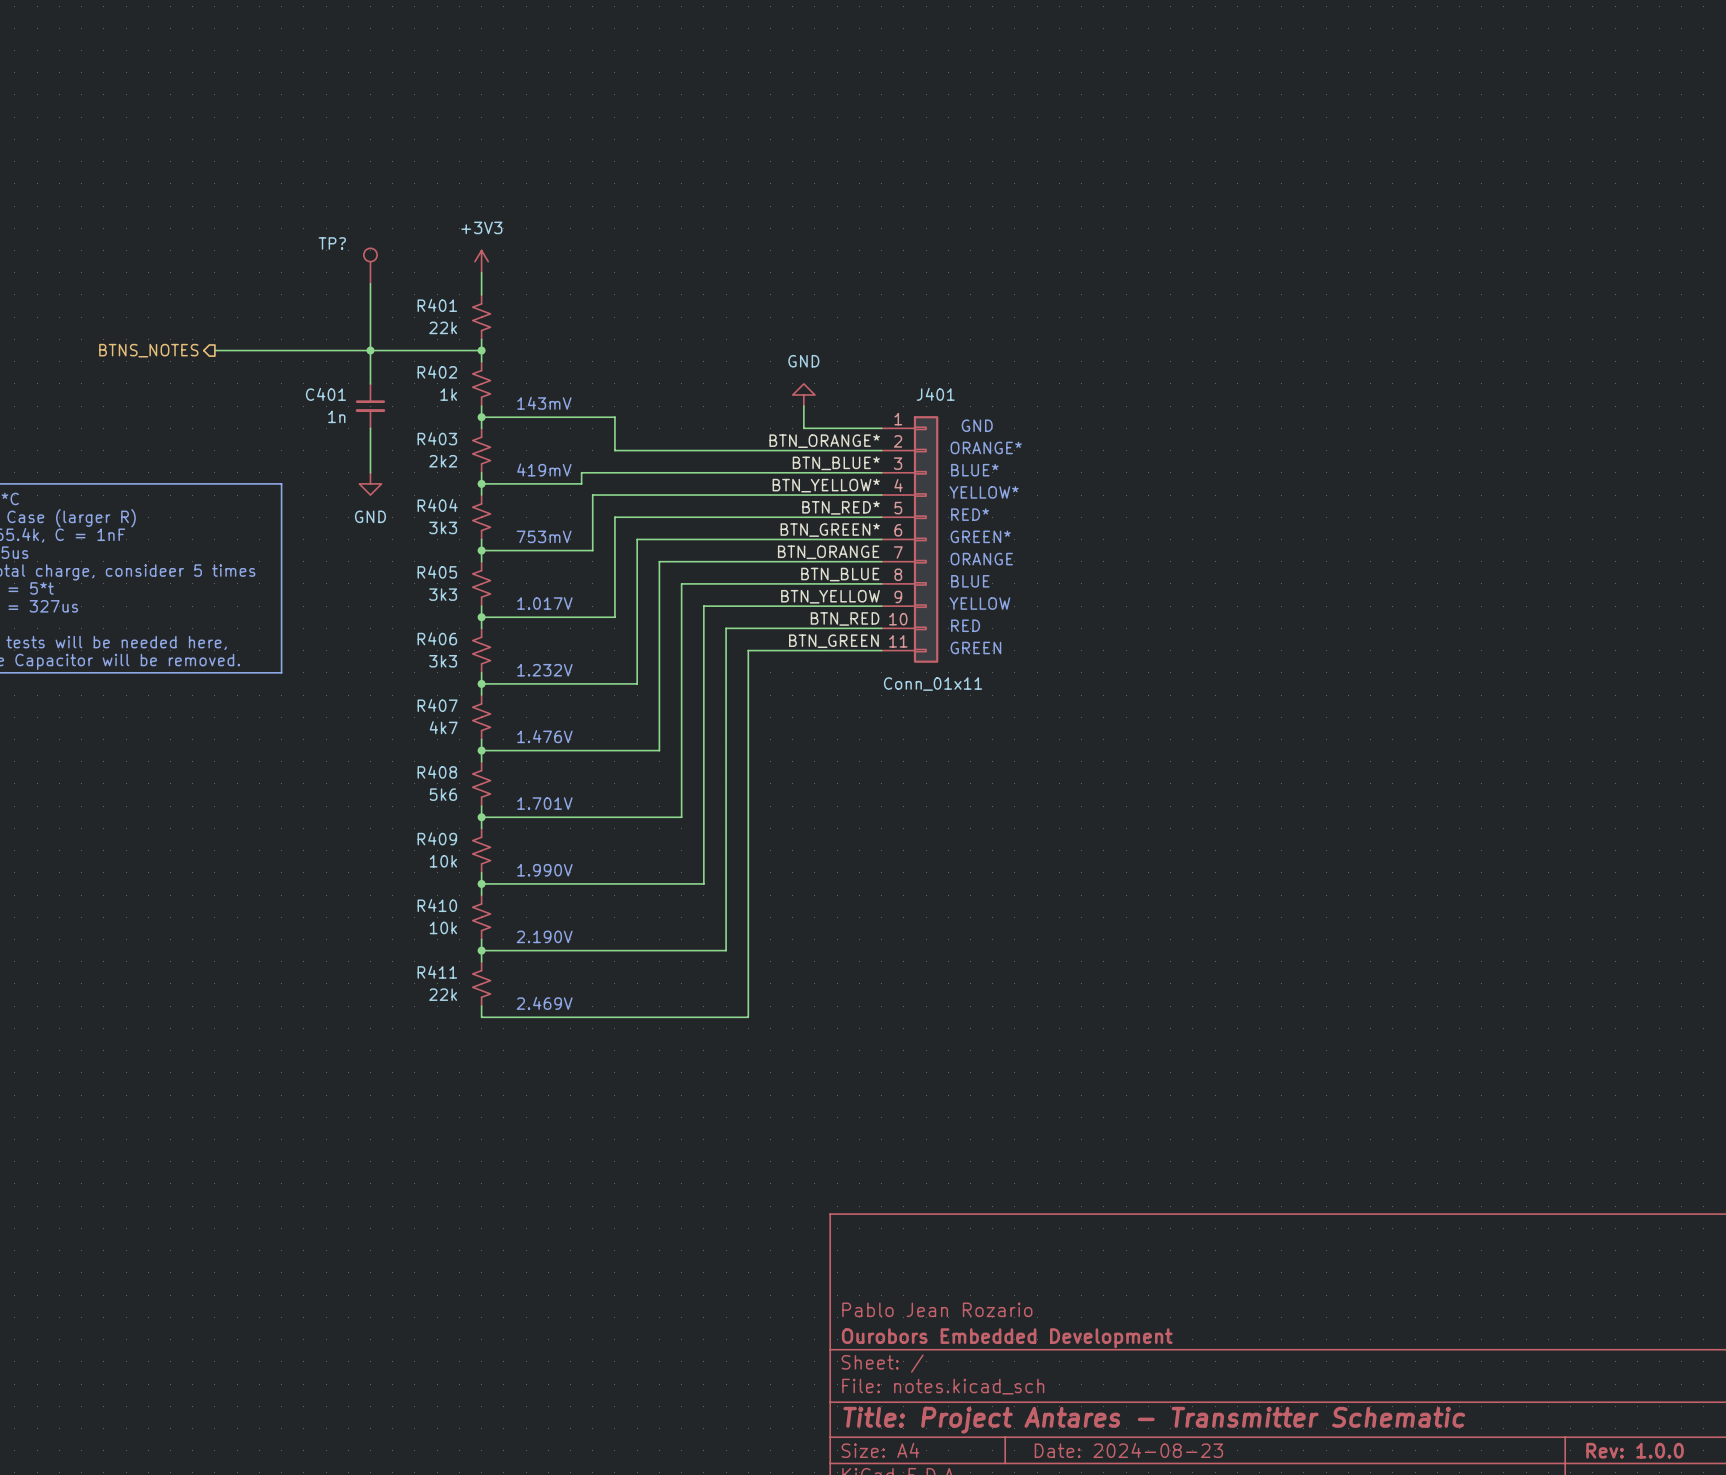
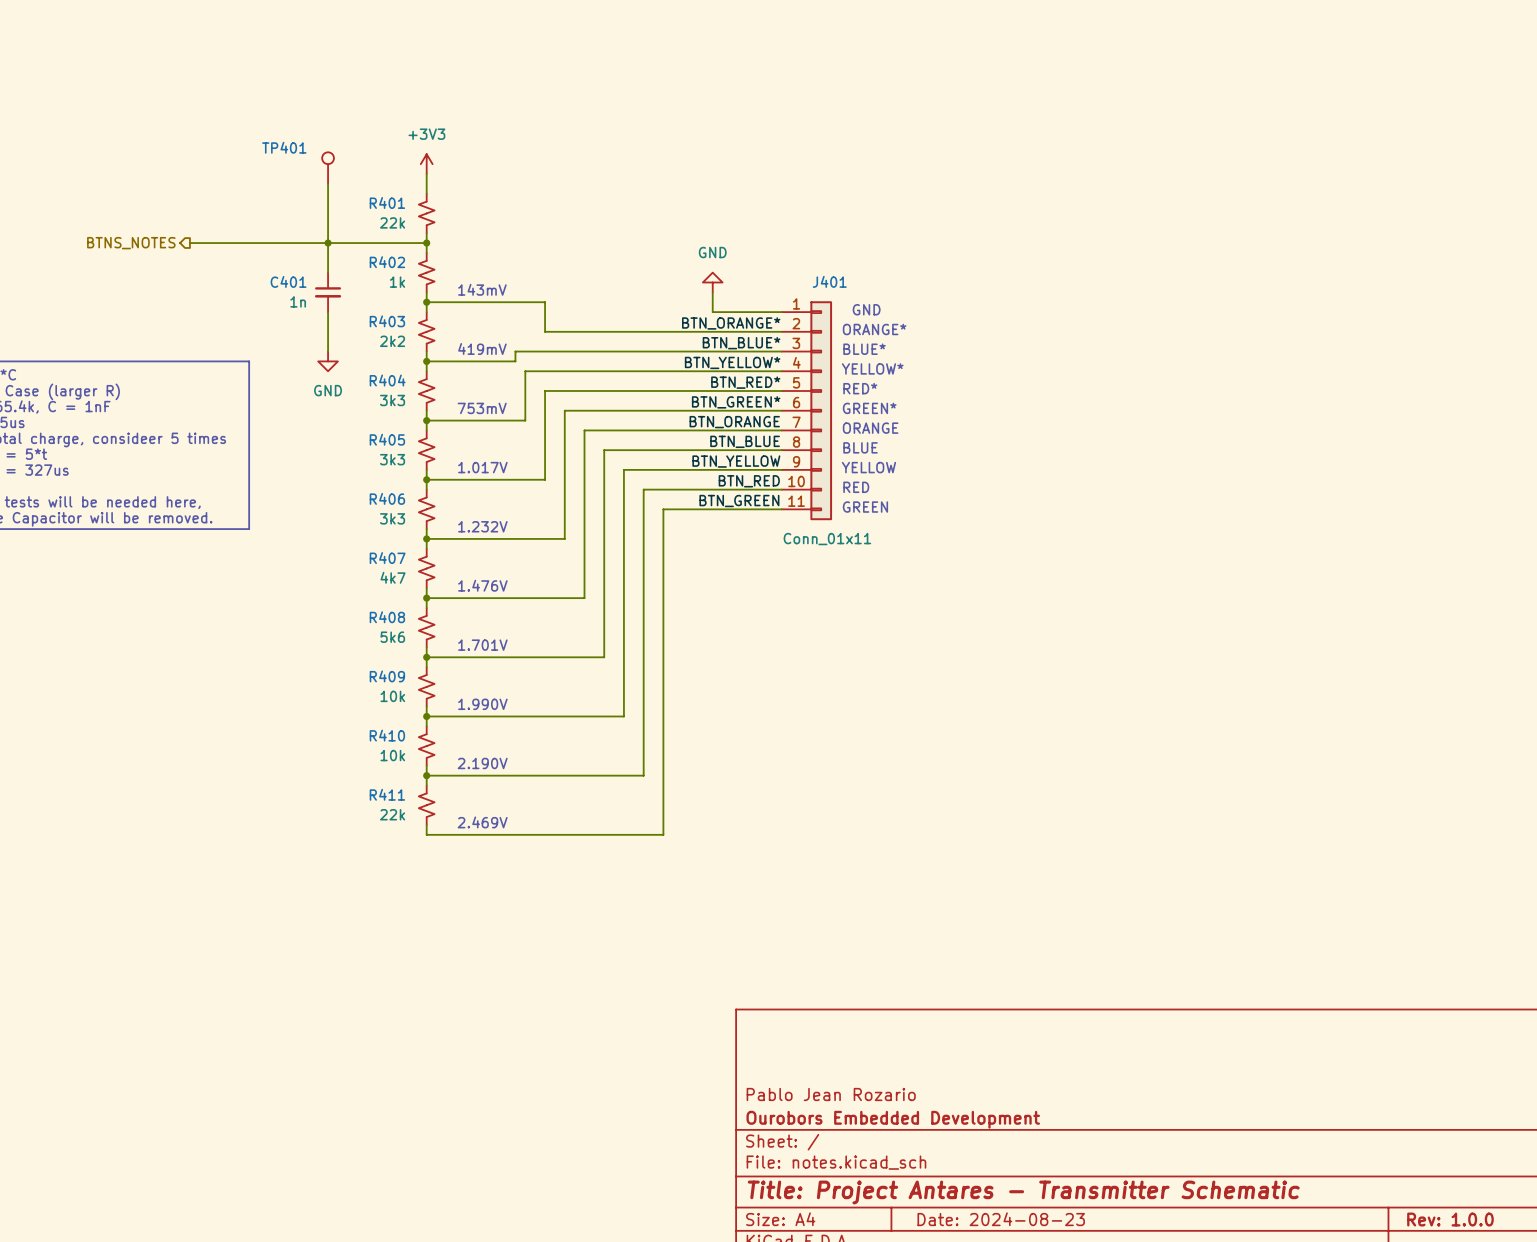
TP? name: TP? (332, 243) -> TP401 (284, 147)

